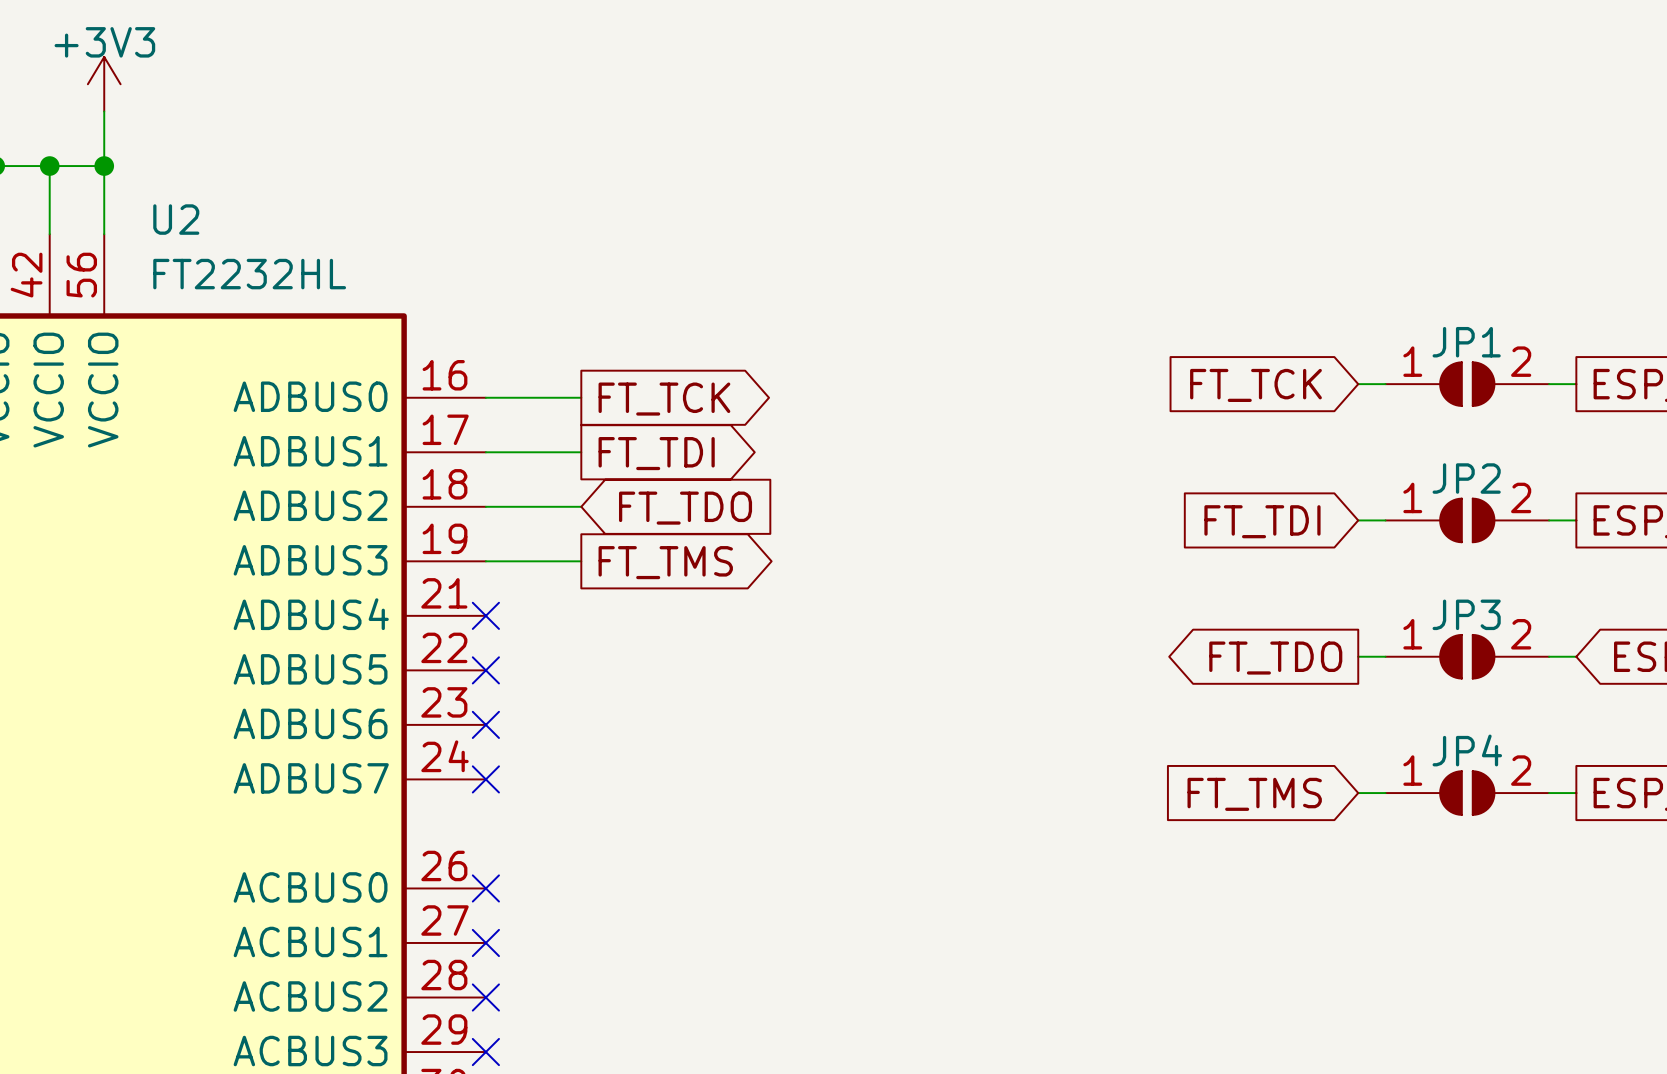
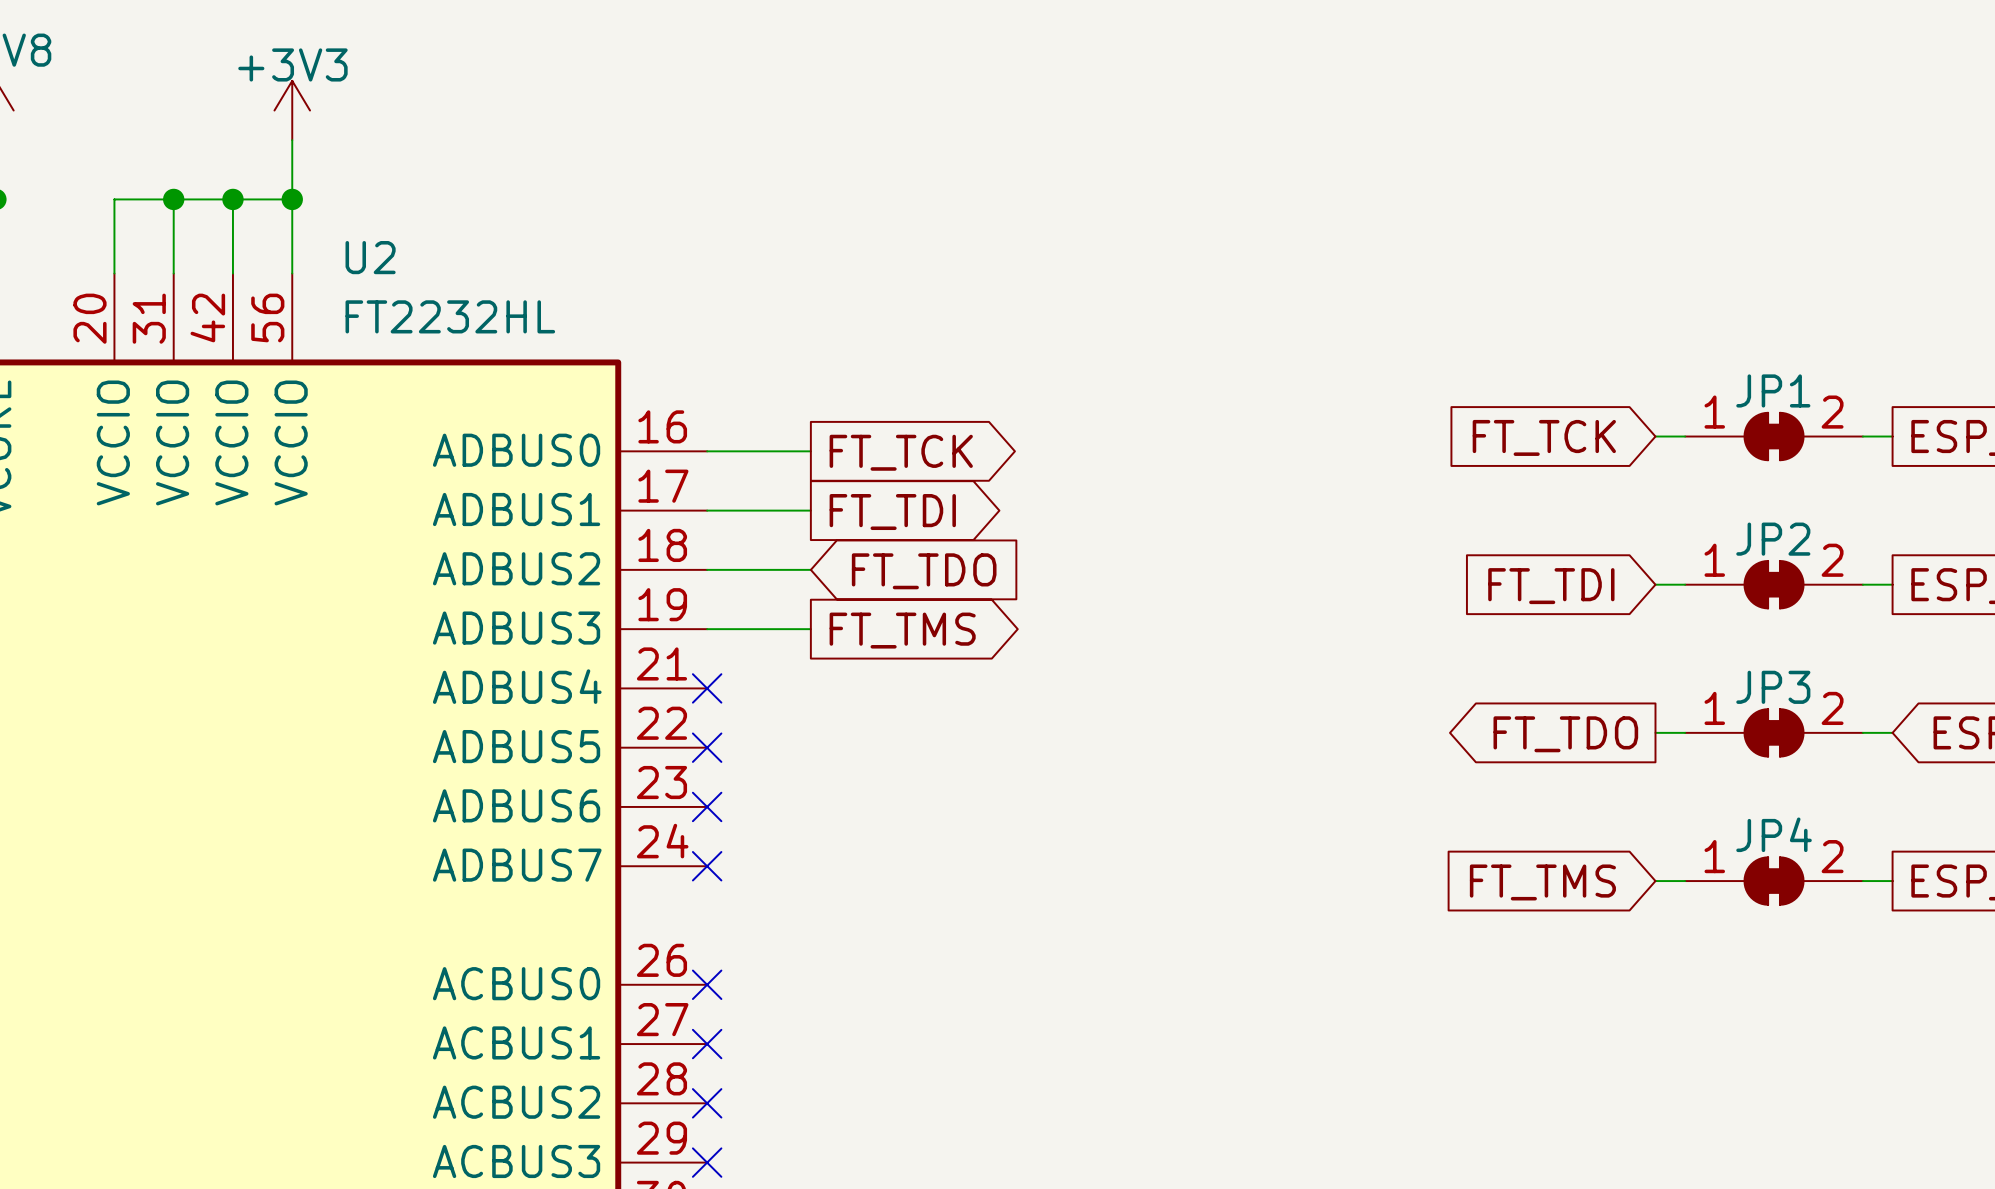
JP1 symbol: [1385, 362, 1550, 406] -> [1685, 412, 1863, 461]
JP2 symbol: [1385, 498, 1550, 543] -> [1685, 560, 1863, 609]
JP3 symbol: [1385, 634, 1550, 679] -> [1685, 709, 1863, 757]
JP4 symbol: [1385, 771, 1550, 815] -> [1685, 857, 1863, 905]

